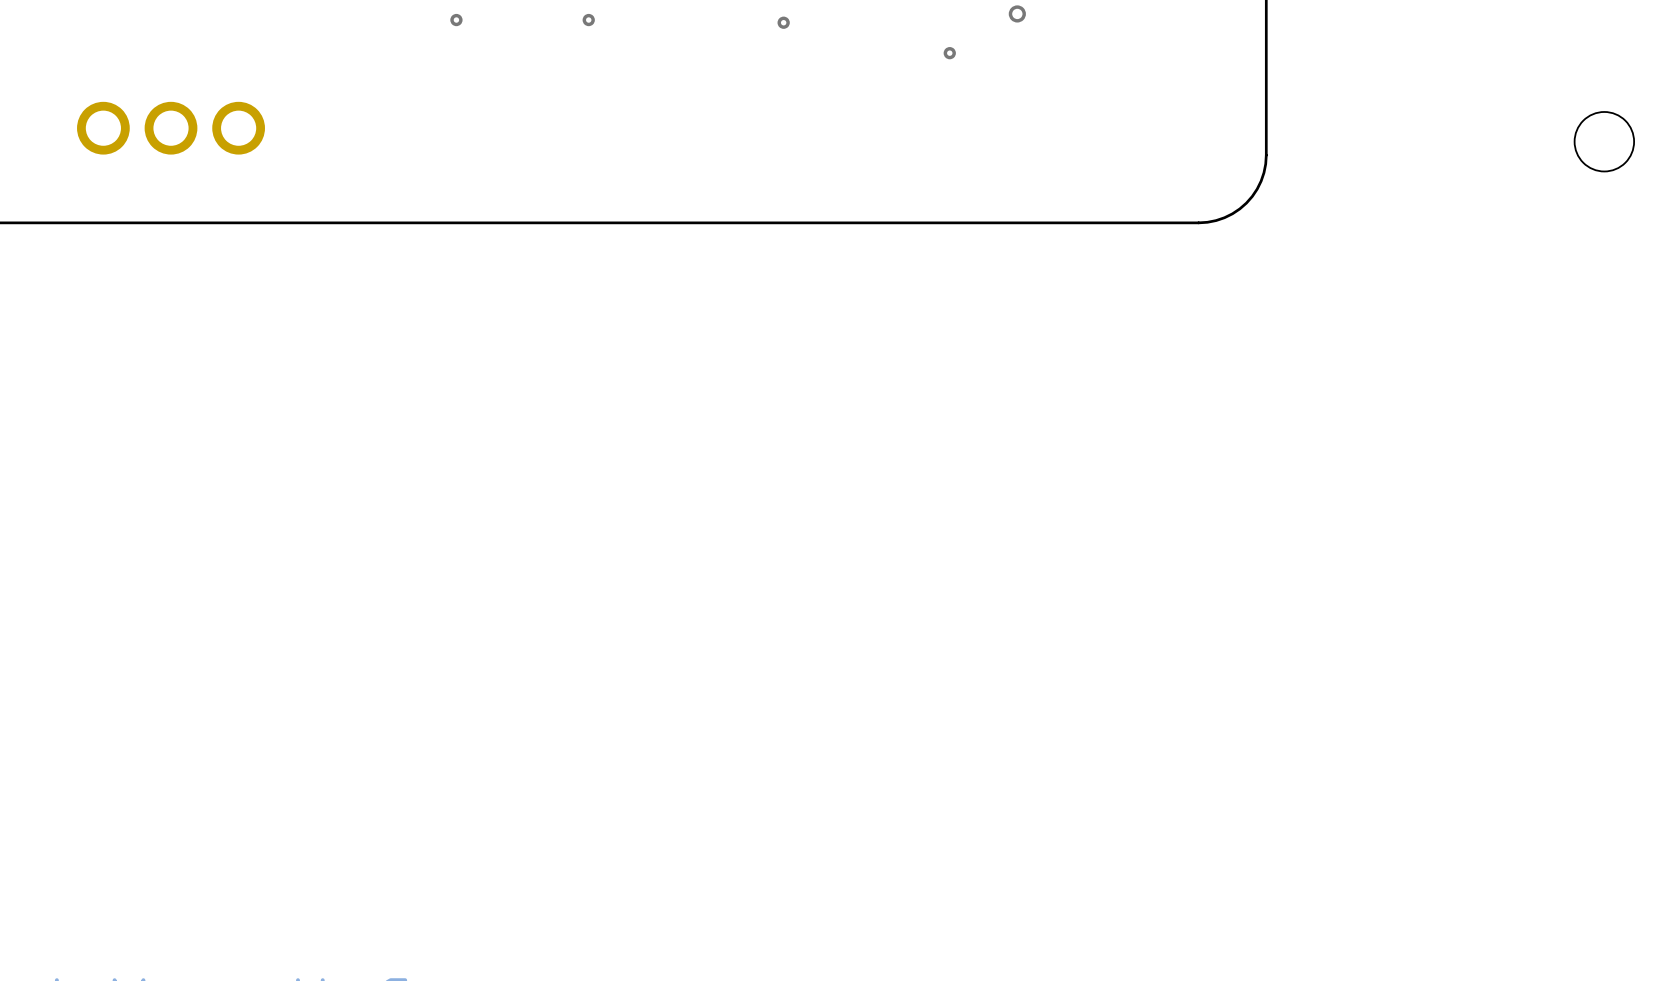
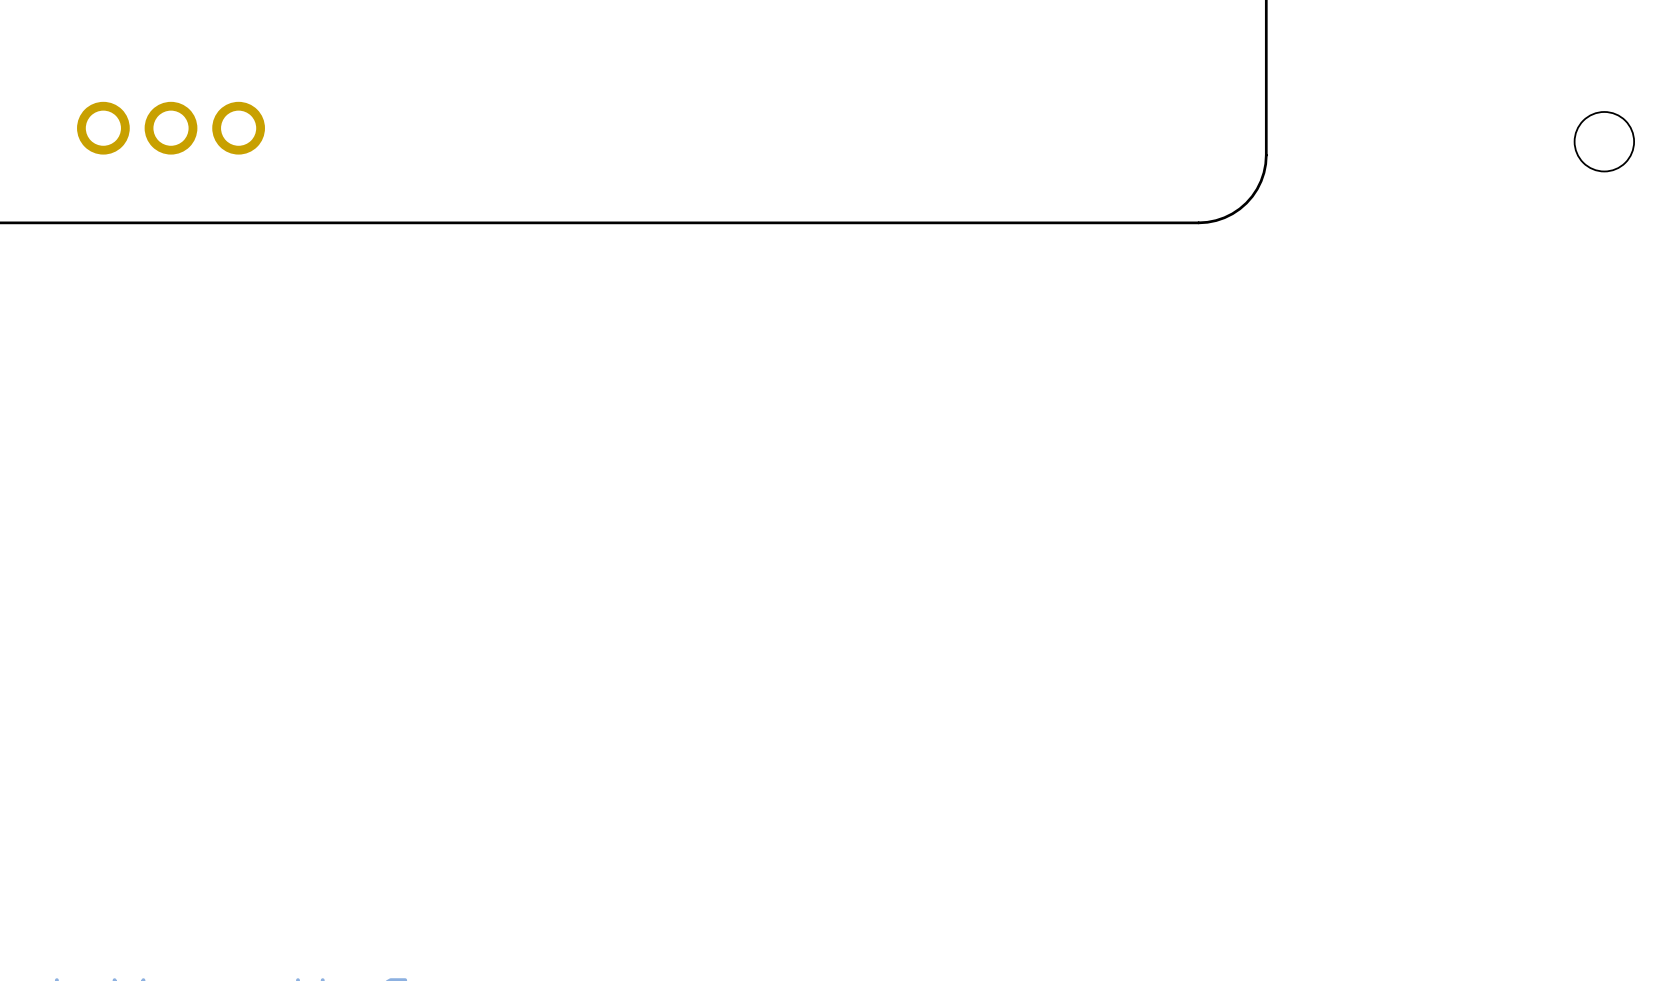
via: (1017, 13) -> none
via: (456, 20) -> none
via: (588, 20) -> none
via: (783, 22) -> none
via: (949, 53) -> none

